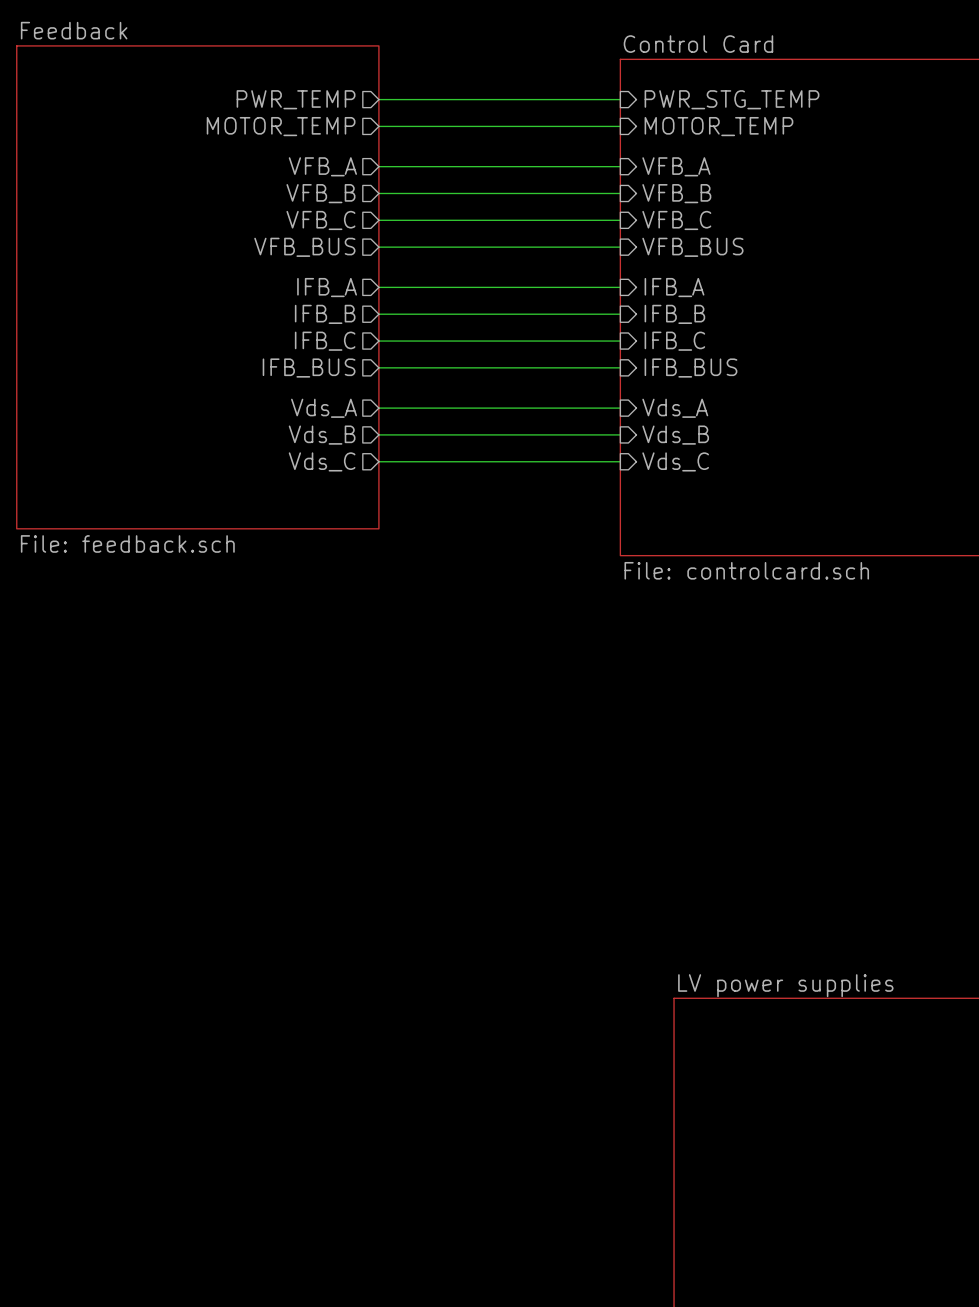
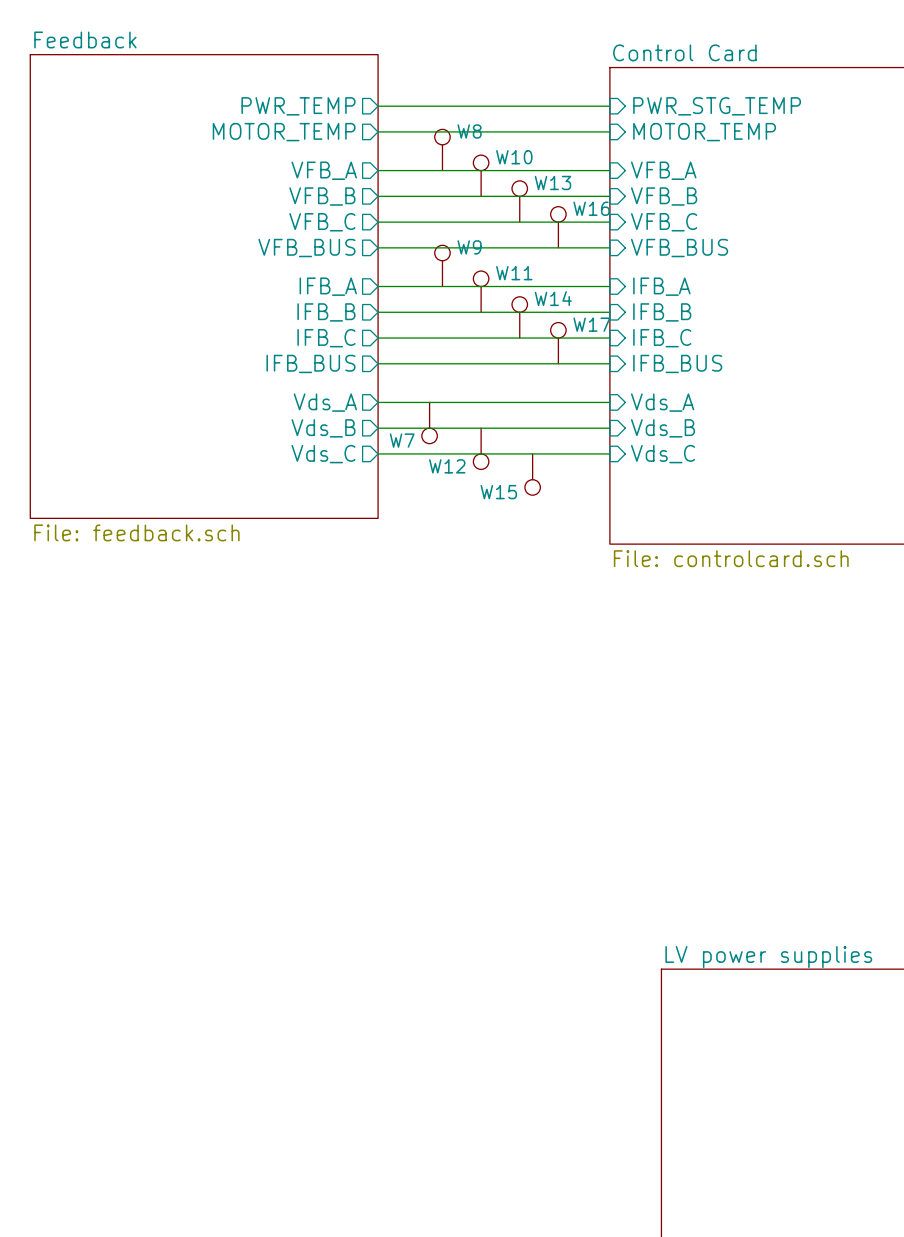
W8: none -> (442, 149)
W10: none -> (481, 175)
W13: none -> (519, 201)
W16: none -> (558, 227)
W9: none -> (442, 265)
W11: none -> (481, 291)
W14: none -> (519, 317)
W17: none -> (558, 343)
W7: none -> (429, 423)
W12: none -> (481, 448)
W15: none -> (532, 474)

